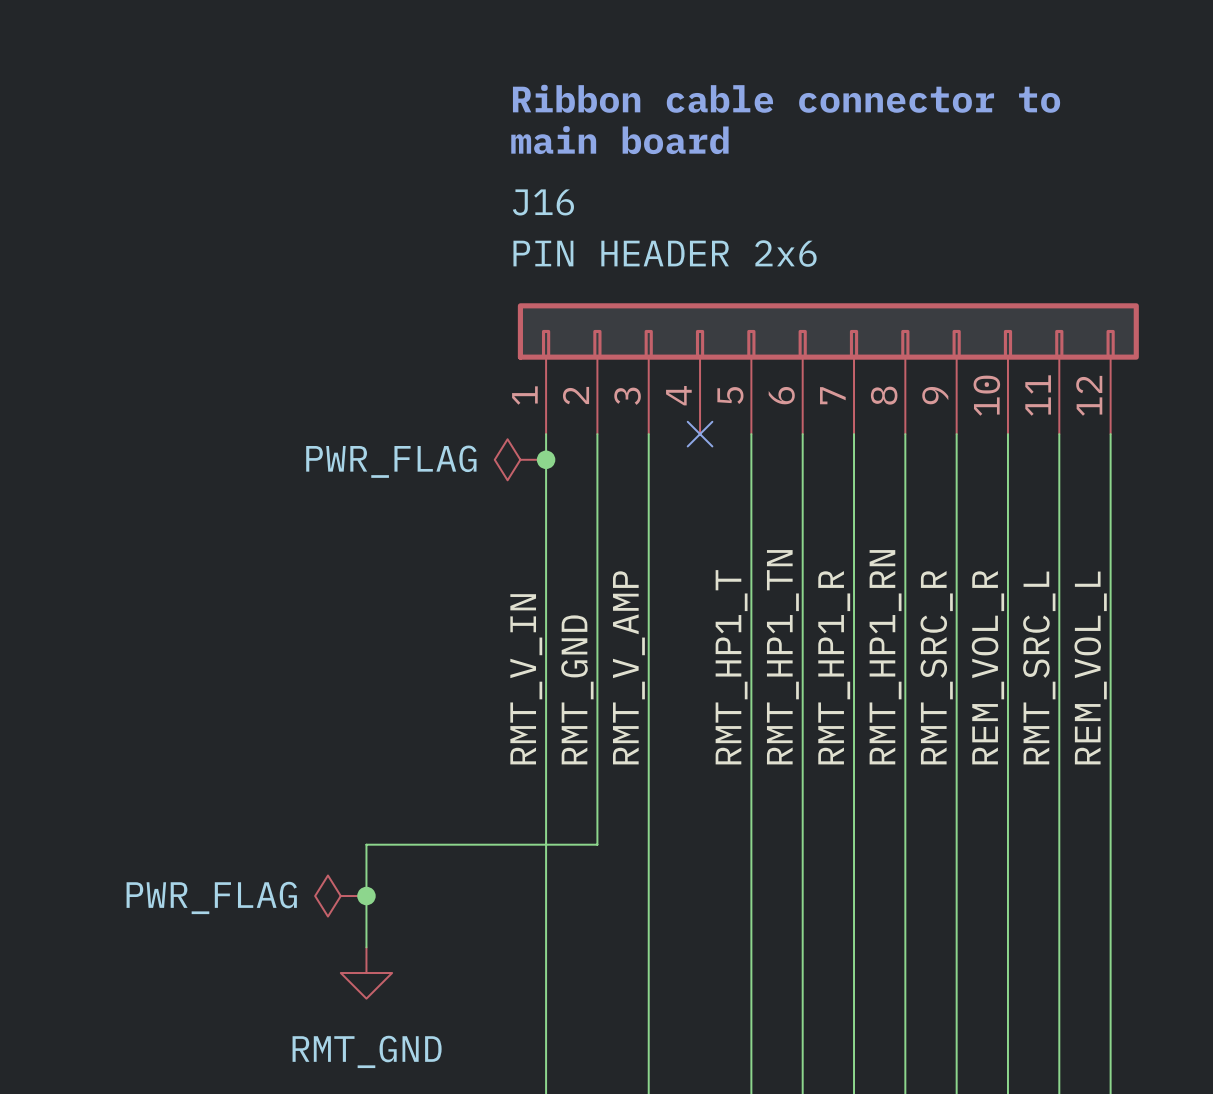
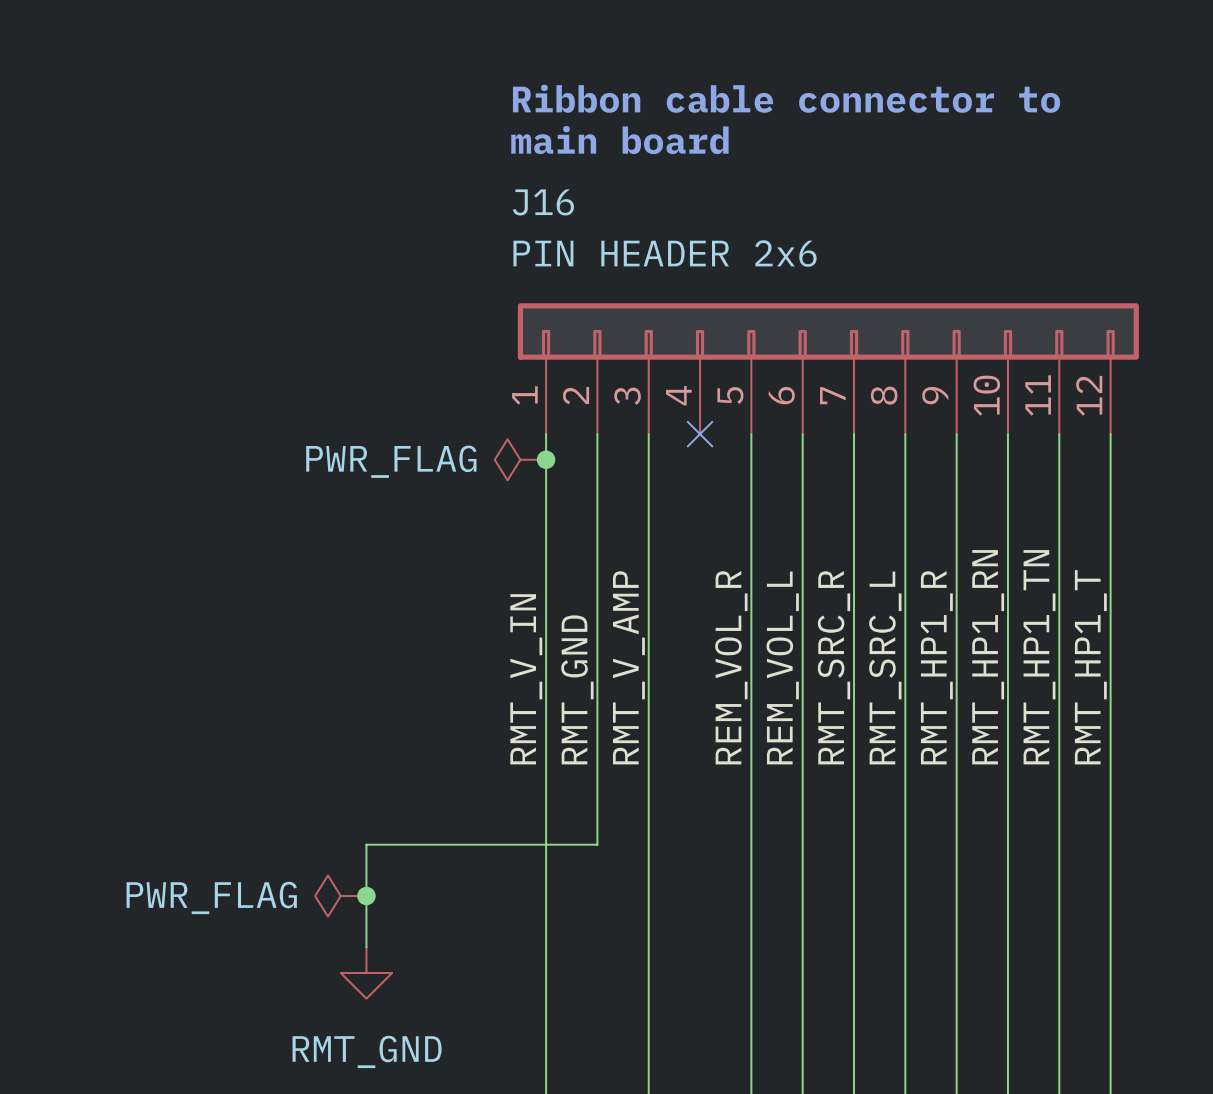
label: RMT_HP1_TN (782, 657) -> REM_VOL_L (782, 667)
label: RMT_HP1_RN (885, 657) -> RMT_SRC_L (885, 667)
label: RMT_HP1_T (731, 667) -> REM_VOL_R (731, 667)
label: RMT_HP1_R (834, 667) -> RMT_SRC_R (834, 667)
label: RMT_SRC_R (936, 667) -> RMT_HP1_R (936, 667)
label: REM_VOL_R (987, 667) -> RMT_HP1_RN (988, 657)
label: RMT_SRC_L (1039, 667) -> RMT_HP1_TN (1039, 657)
label: REM_VOL_L (1090, 667) -> RMT_HP1_T (1090, 667)

